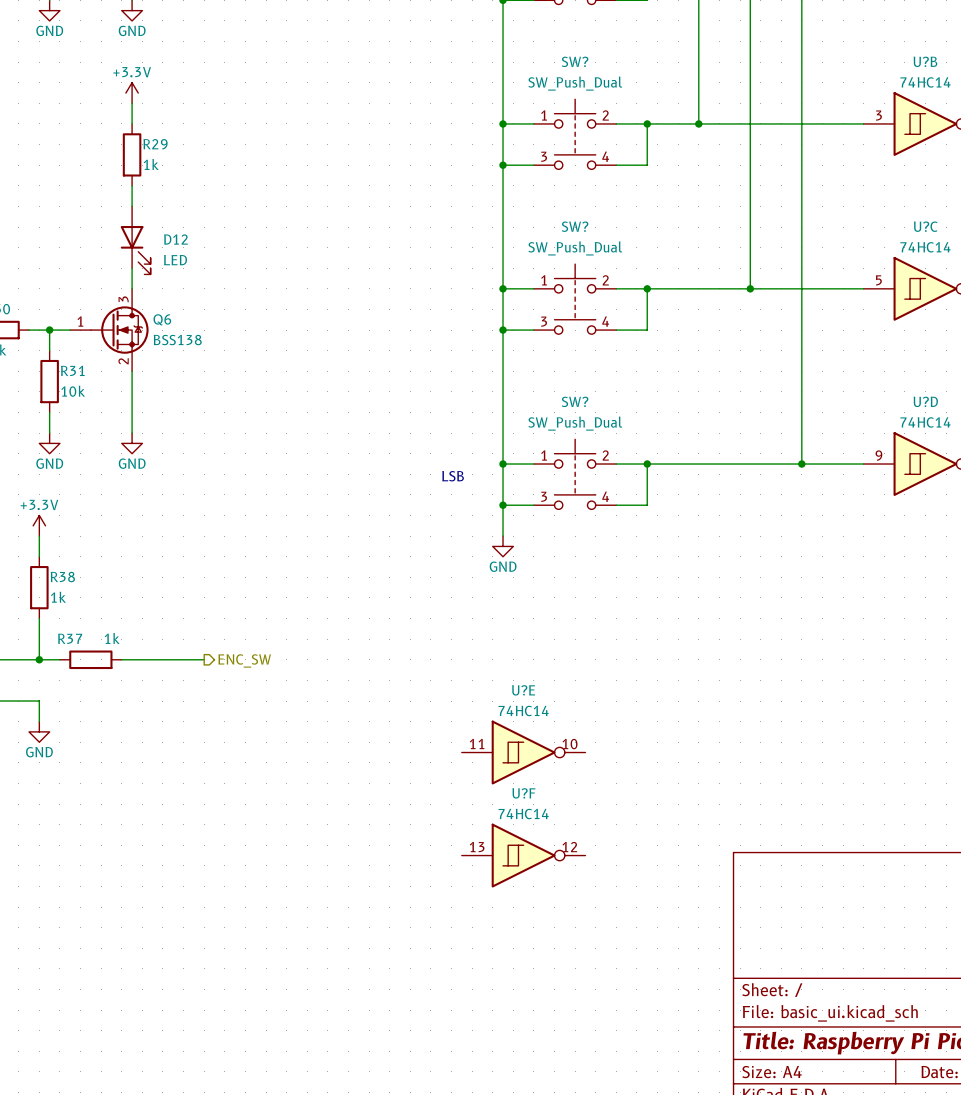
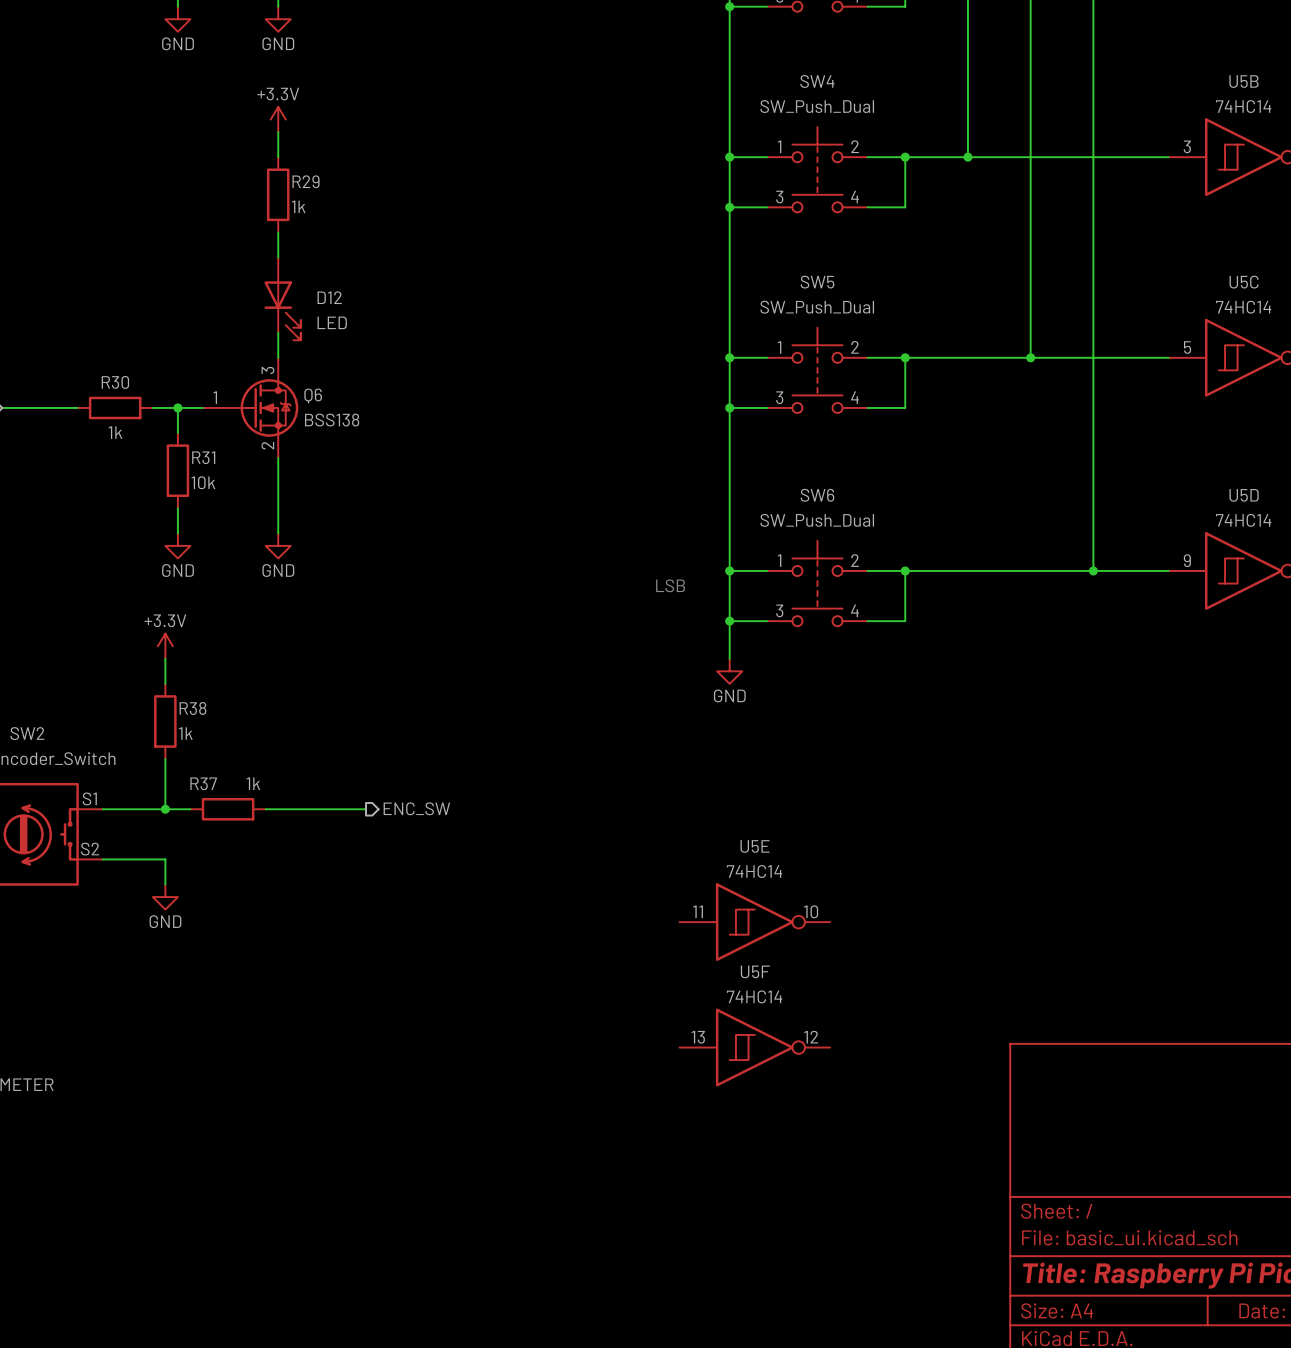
SW? name: SW? (575, 61) -> SW4 (817, 81)
U?B name: U?B (925, 61) -> U5B (1243, 81)
SW? name: SW? (575, 226) -> SW5 (817, 282)
U?C name: U?C (925, 226) -> U5C (1244, 282)
SW? name: SW? (575, 401) -> SW6 (817, 495)
U?D name: U?D (925, 401) -> U5D (1244, 495)
U?E name: U?E (523, 690) -> U5E (755, 846)
U?F name: U?F (523, 793) -> U5F (755, 971)

